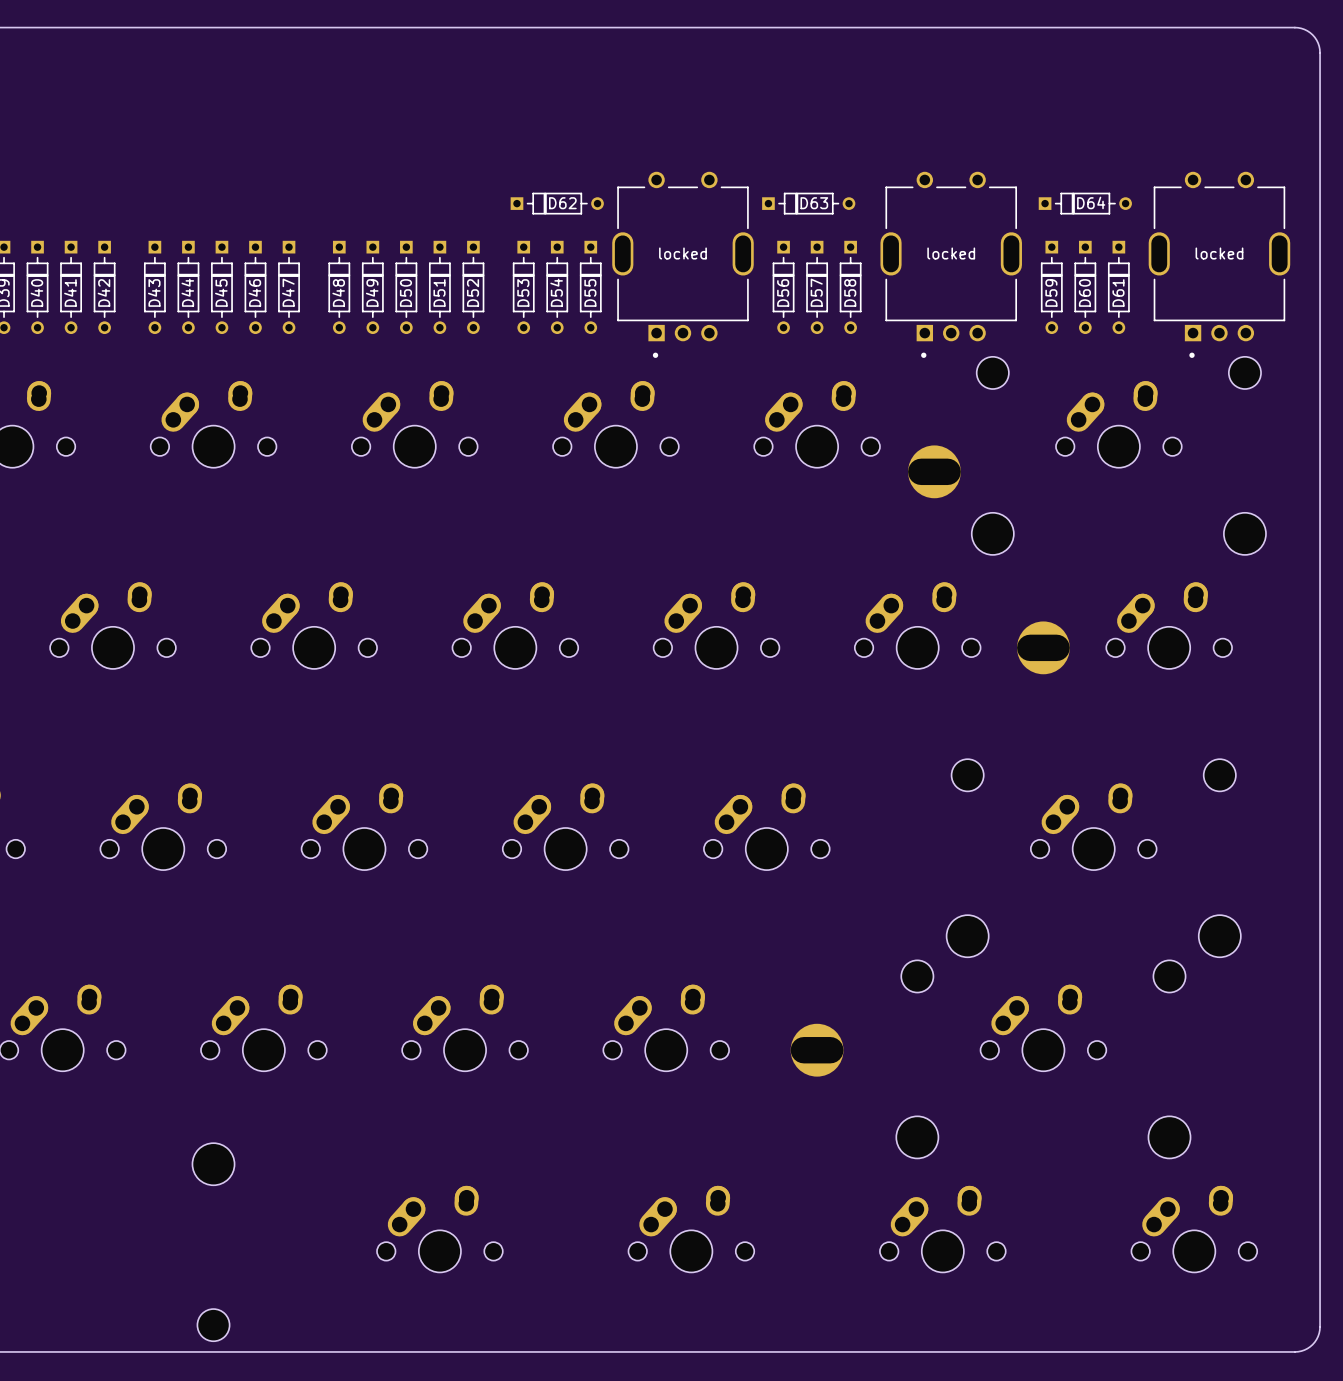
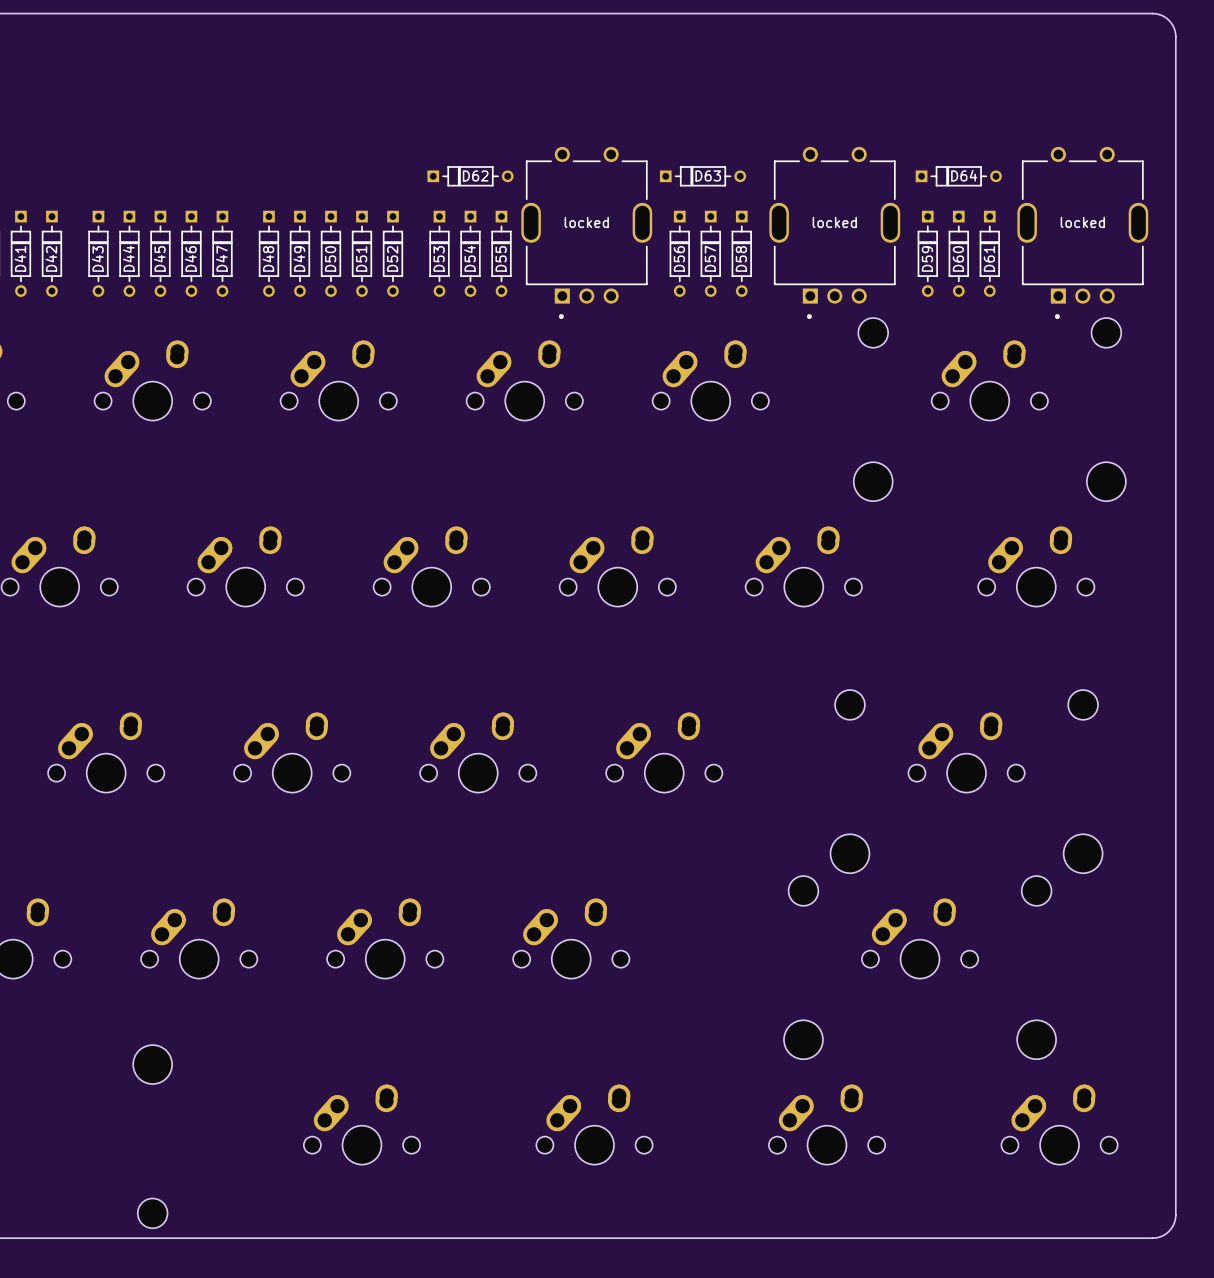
part: (934, 471) -> none
part: (1043, 647) -> none
part: (817, 1050) -> none

